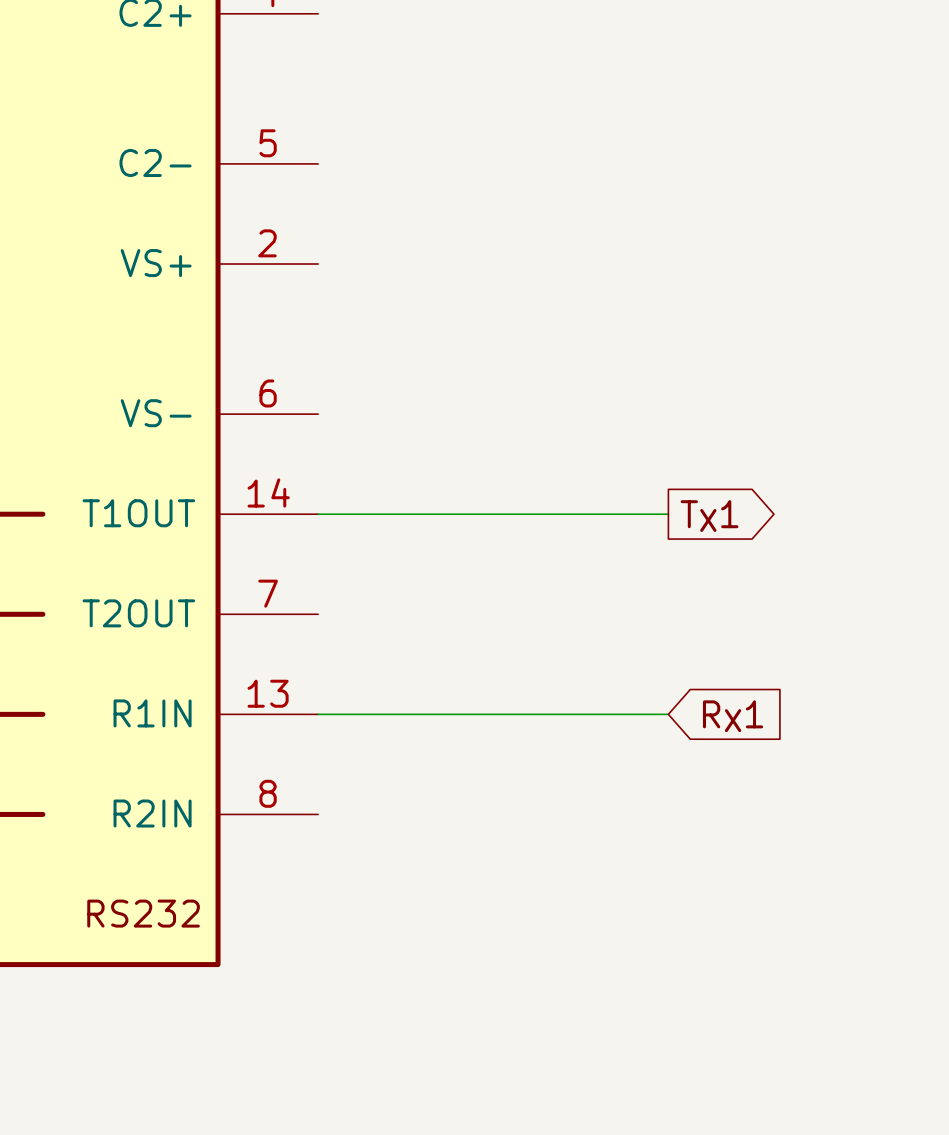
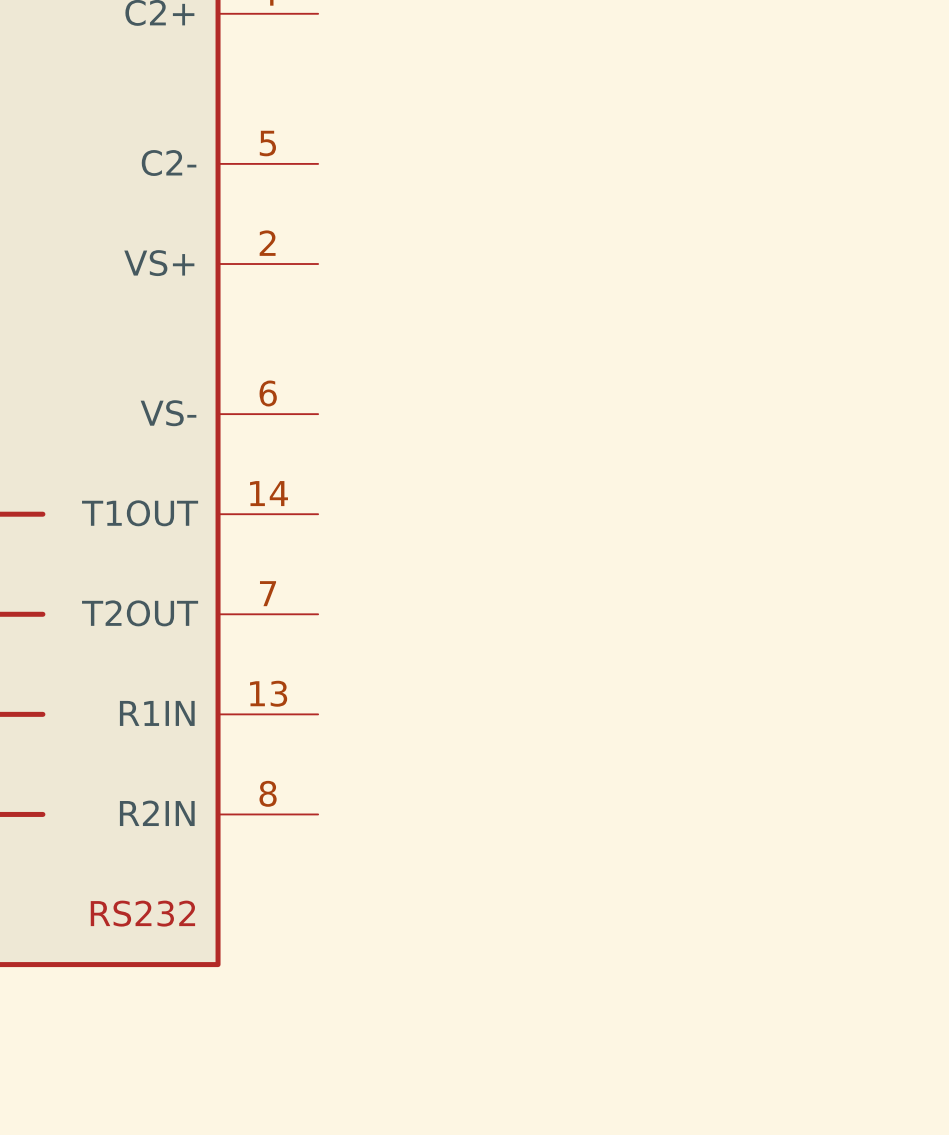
wire: (318, 514) (668, 514) -> none
global label: TX1 (709, 516) -> none
wire: (318, 714) (668, 714) -> none
global label: RX1 (733, 716) -> none

